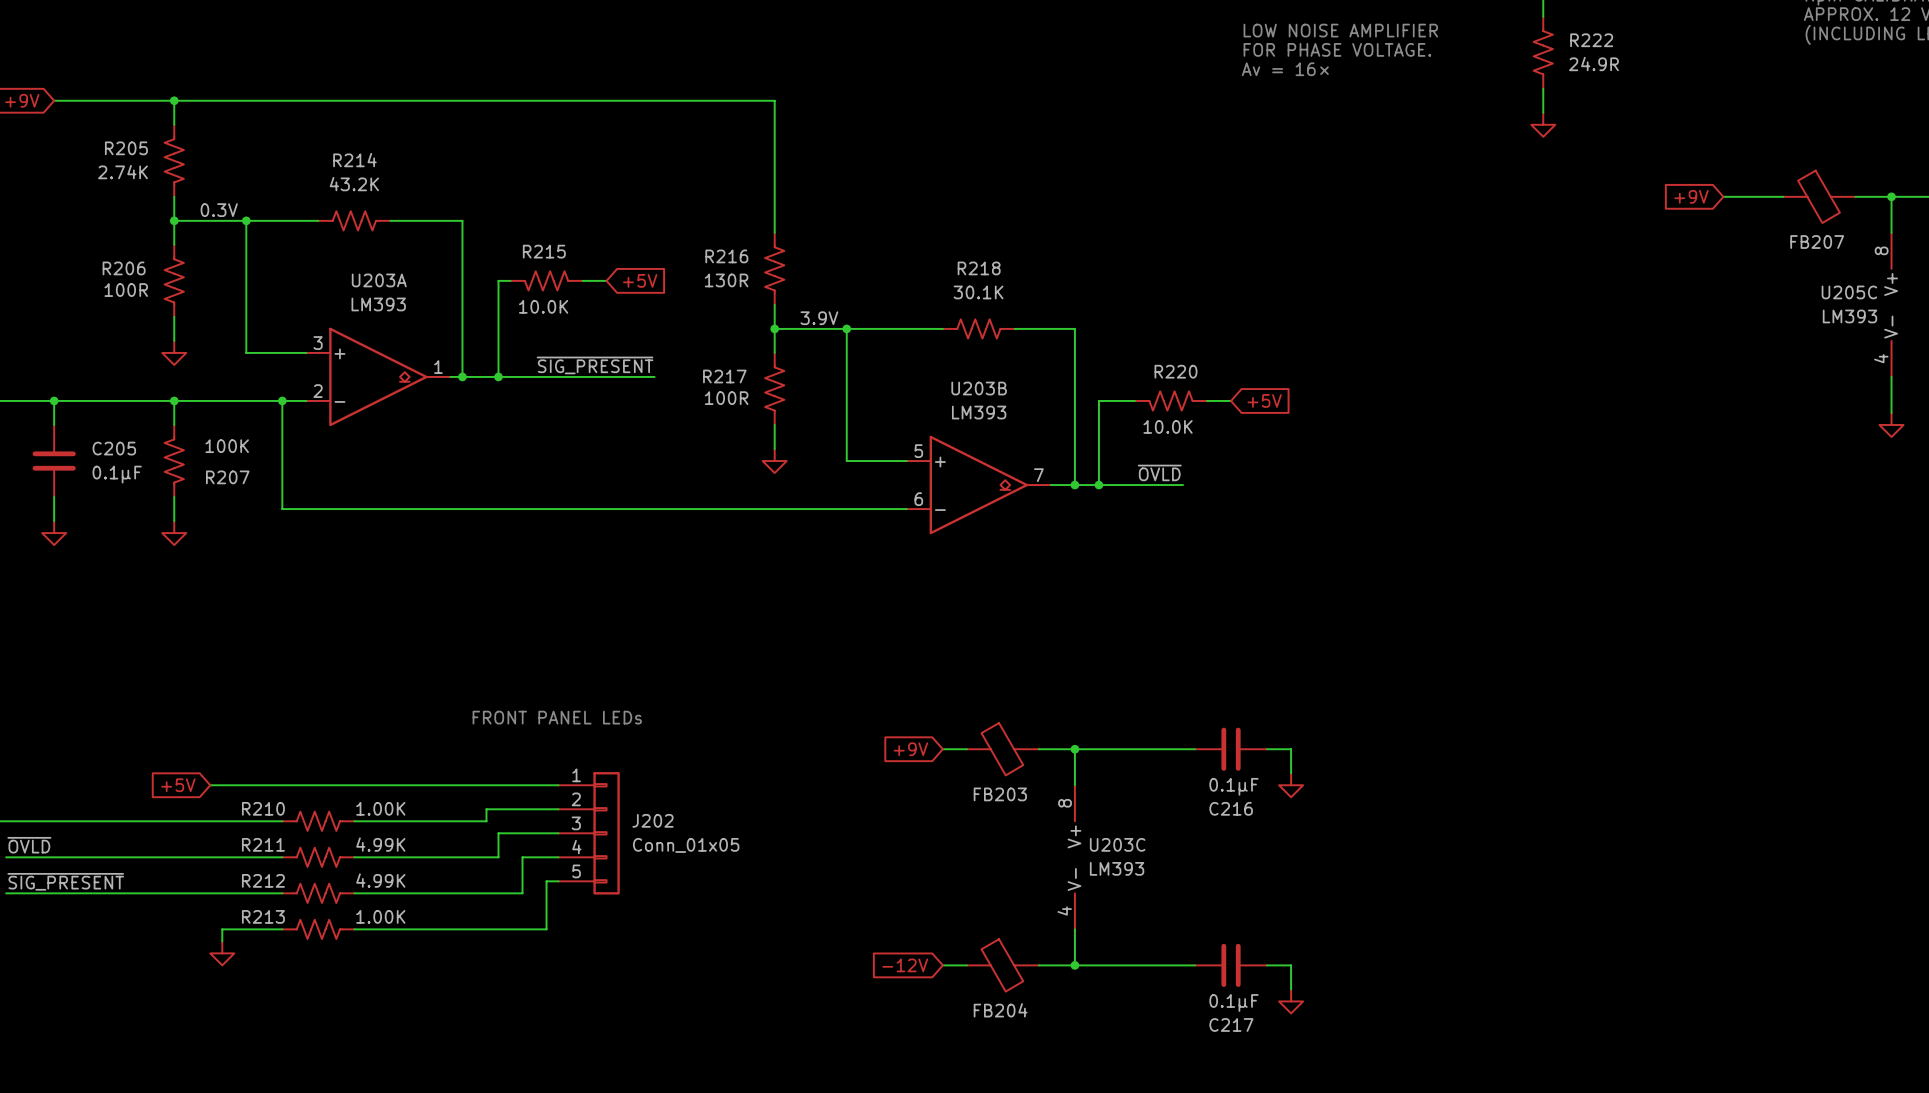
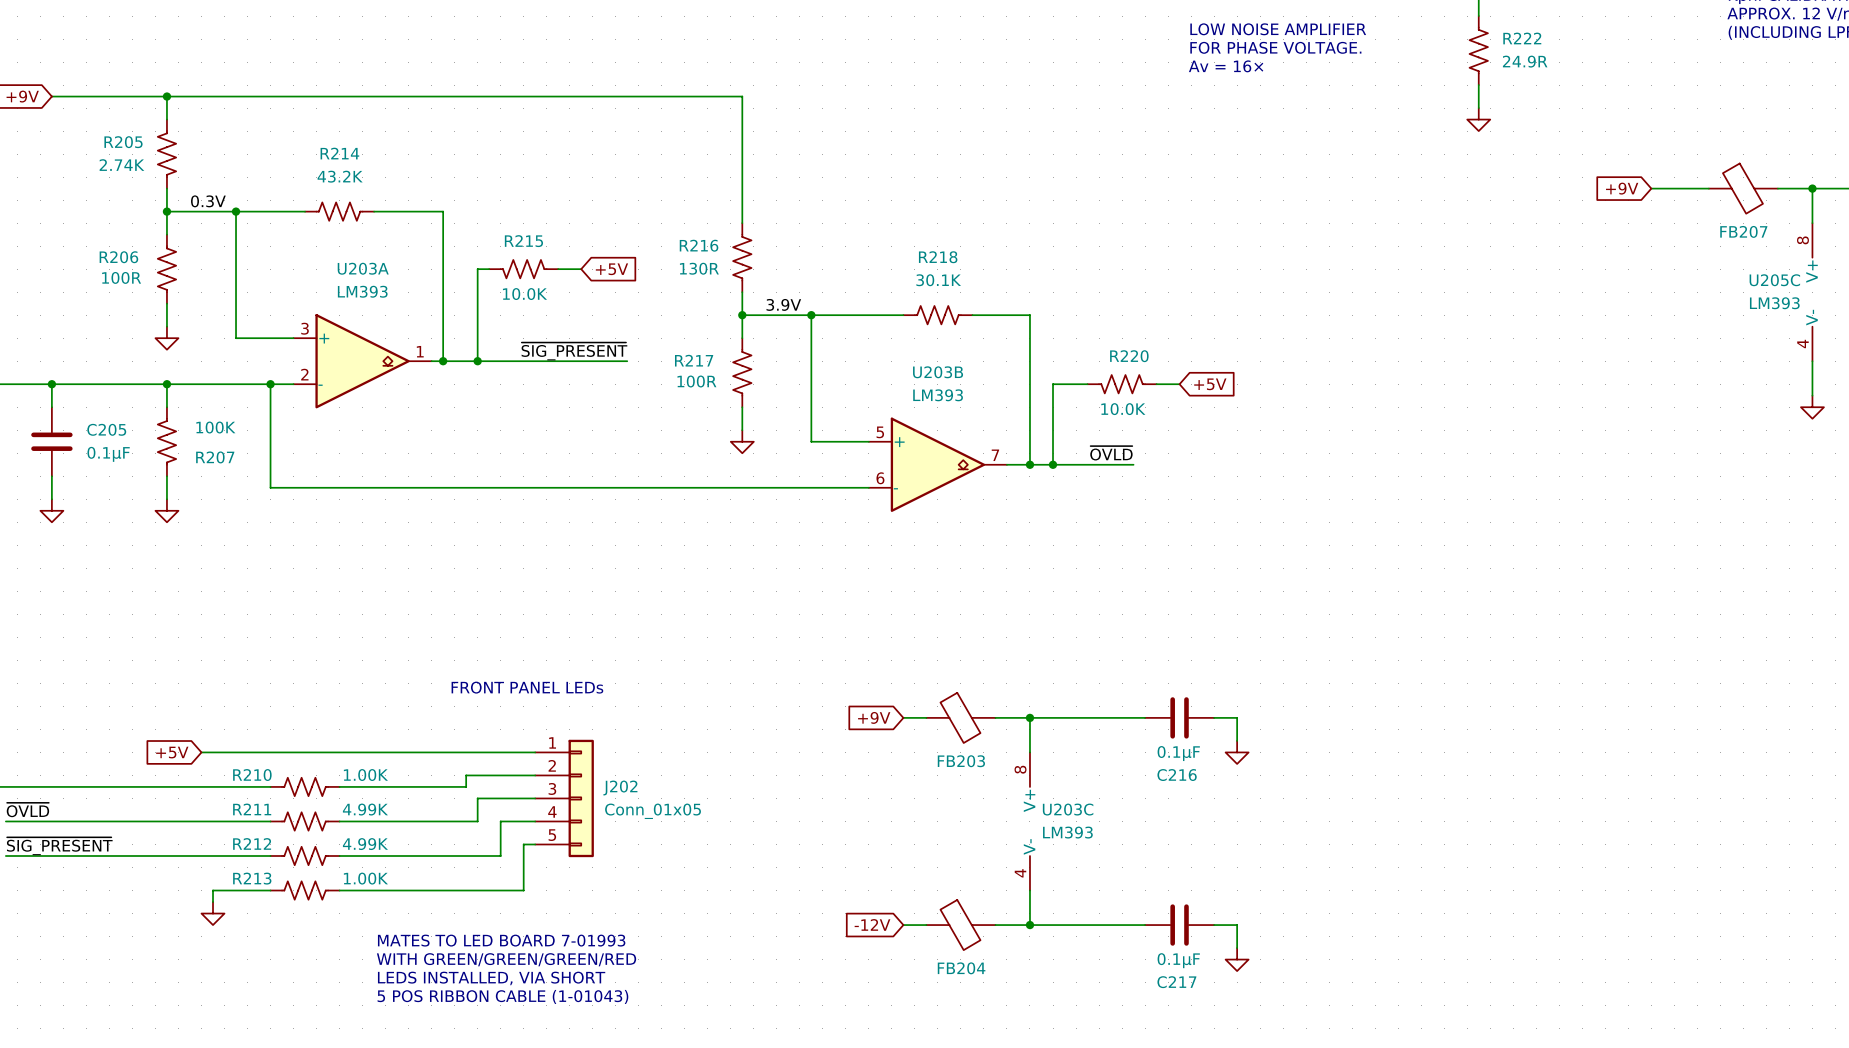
text: none -> MATES TO LED BOARD 7-01993 (501, 940)
text: none -> WITH GREEN/GREEN/GREEN/RED (506, 959)
text: none -> LEDS INSTALLED, VIA SHORT (491, 978)
text: none -> 5 POS RIBBON CABLE (1-01043) (502, 996)

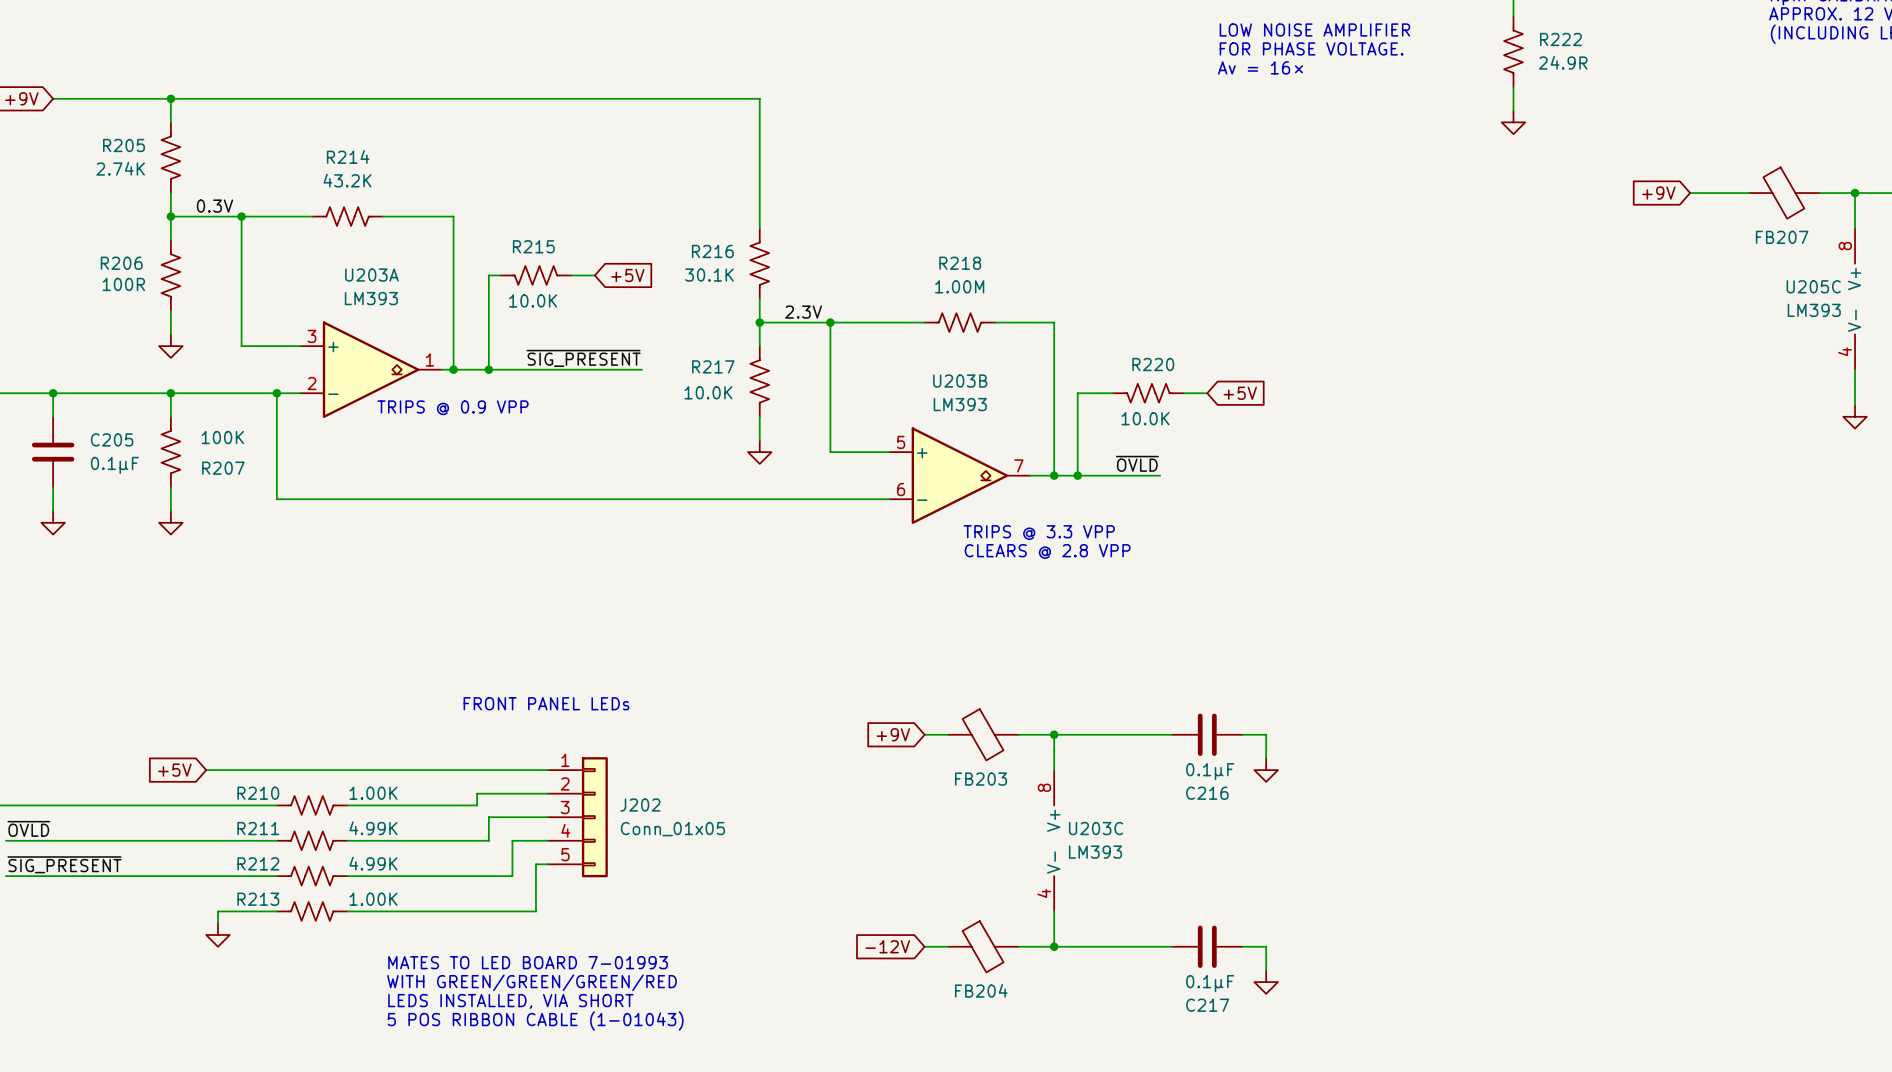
R216 flip: as is (742, 257) -> left-right (759, 263)
R216 value: 130R (699, 268) -> 30.1K (709, 275)
R218 value: 30.1K (938, 280) -> 1.00M (959, 286)
label: 3.9V (783, 304) -> 2.3V (803, 312)
R217 flip: as is (742, 372) -> left-right (759, 381)
R217 value: 100R (696, 381) -> 10.0K (708, 392)
text: none -> TRIPS @ 0.9 VPP (452, 407)
text: none -> TRIPS @ 3.3 VPP (1039, 532)
text: none -> CLEARS @ 2.8 VPP (1047, 551)

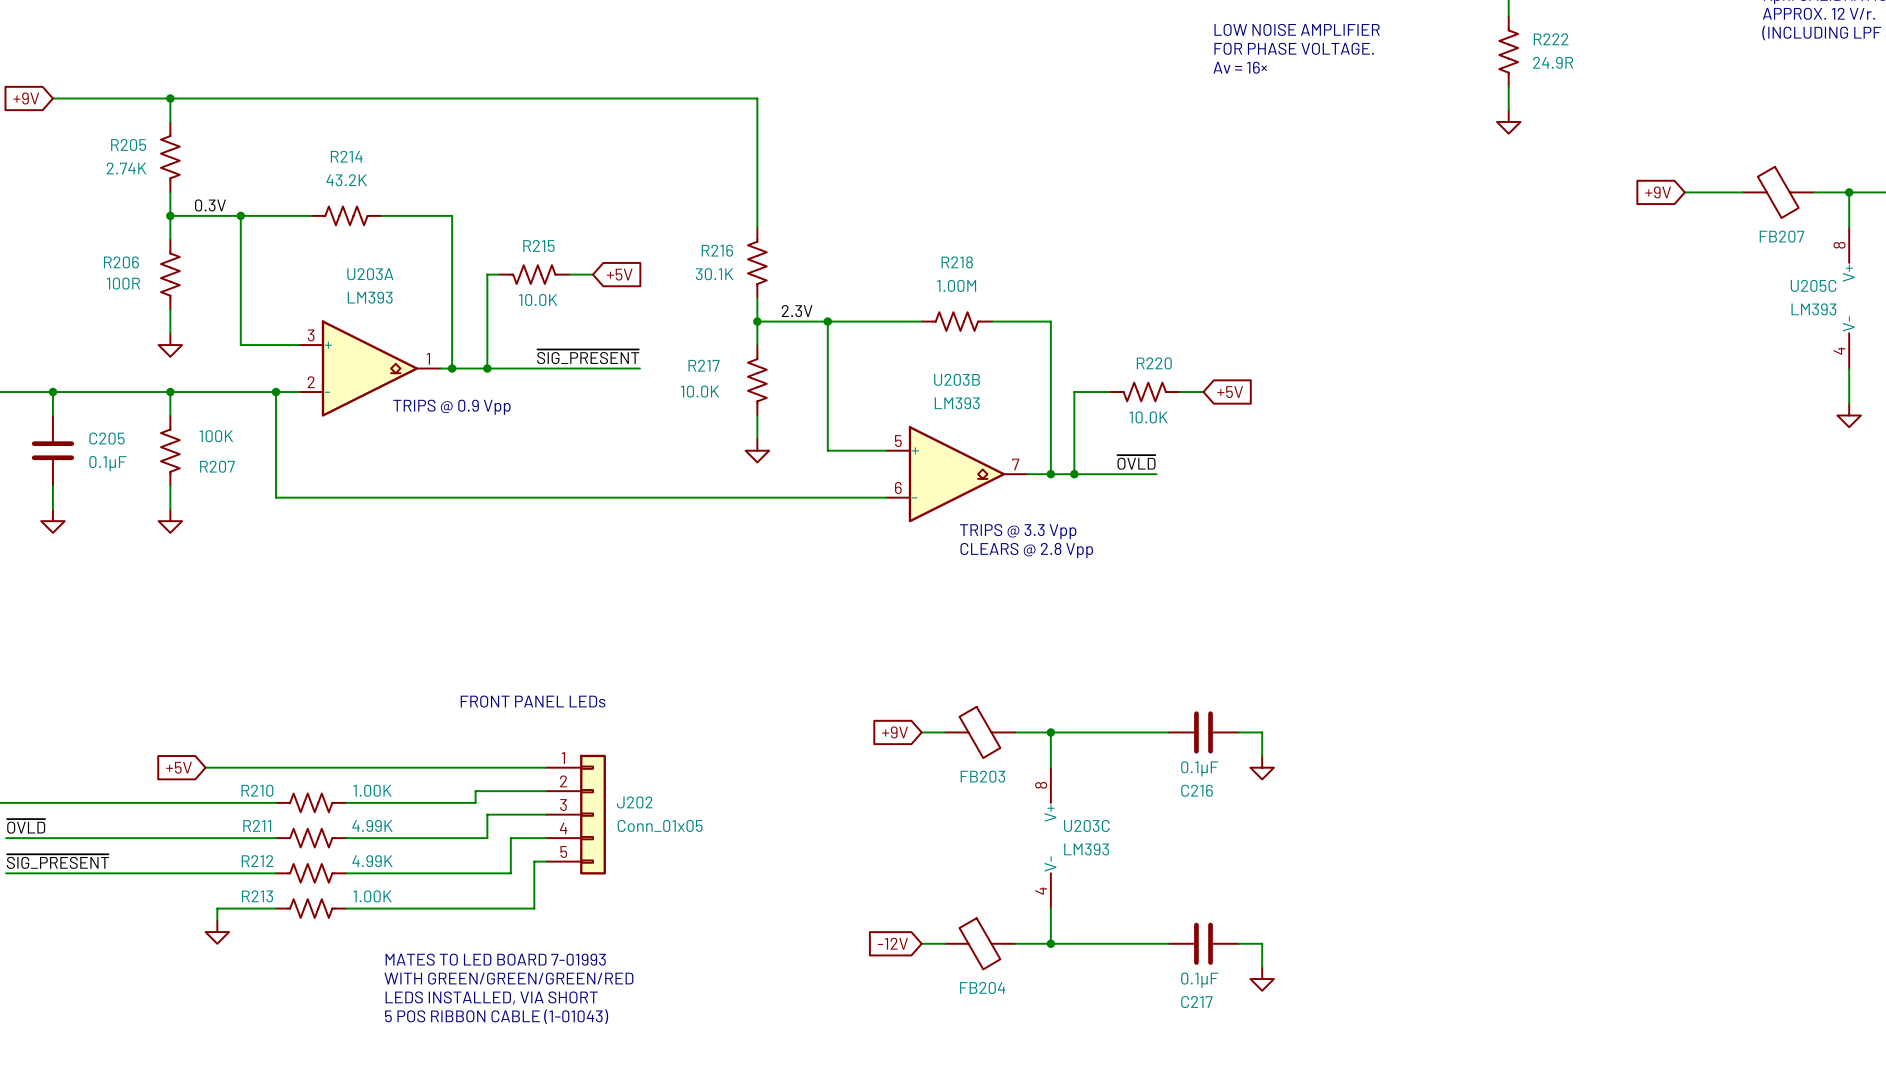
text: TRIPS @ 0.9 VPP (452, 407) -> TRIPS @ 0.9 Vpp (451, 407)
text: TRIPS @ 3.3 VPP (1039, 532) -> TRIPS @ 3.3 Vpp (1018, 531)
text: CLEARS @ 2.8 VPP (1047, 551) -> CLEARS @ 2.8 Vpp (1026, 550)

